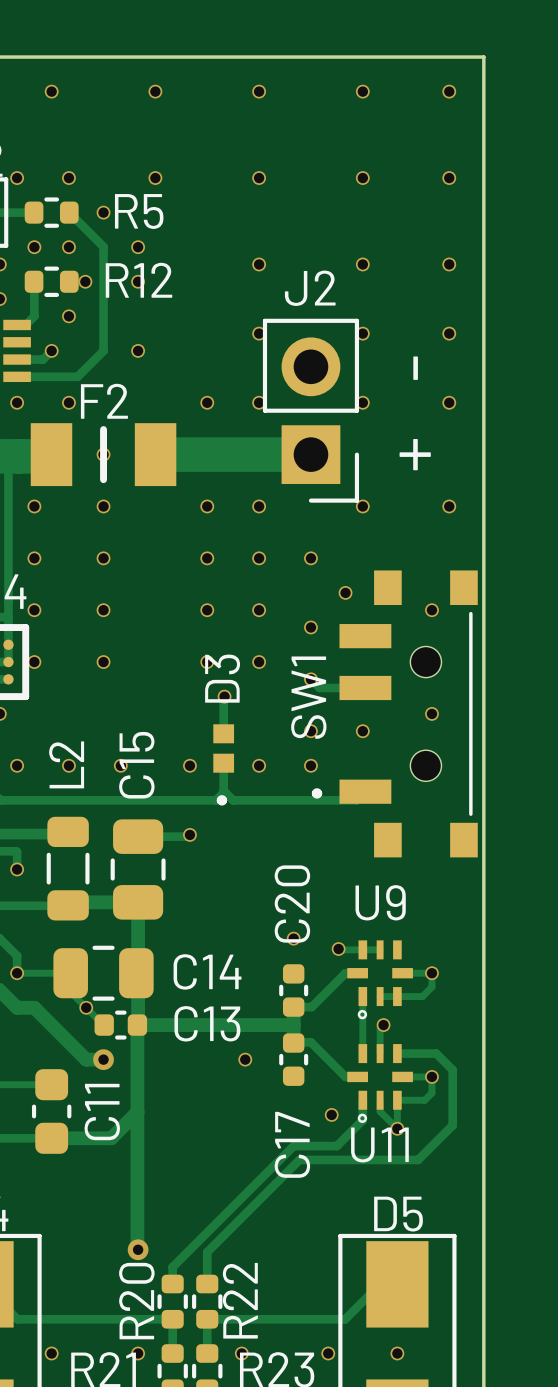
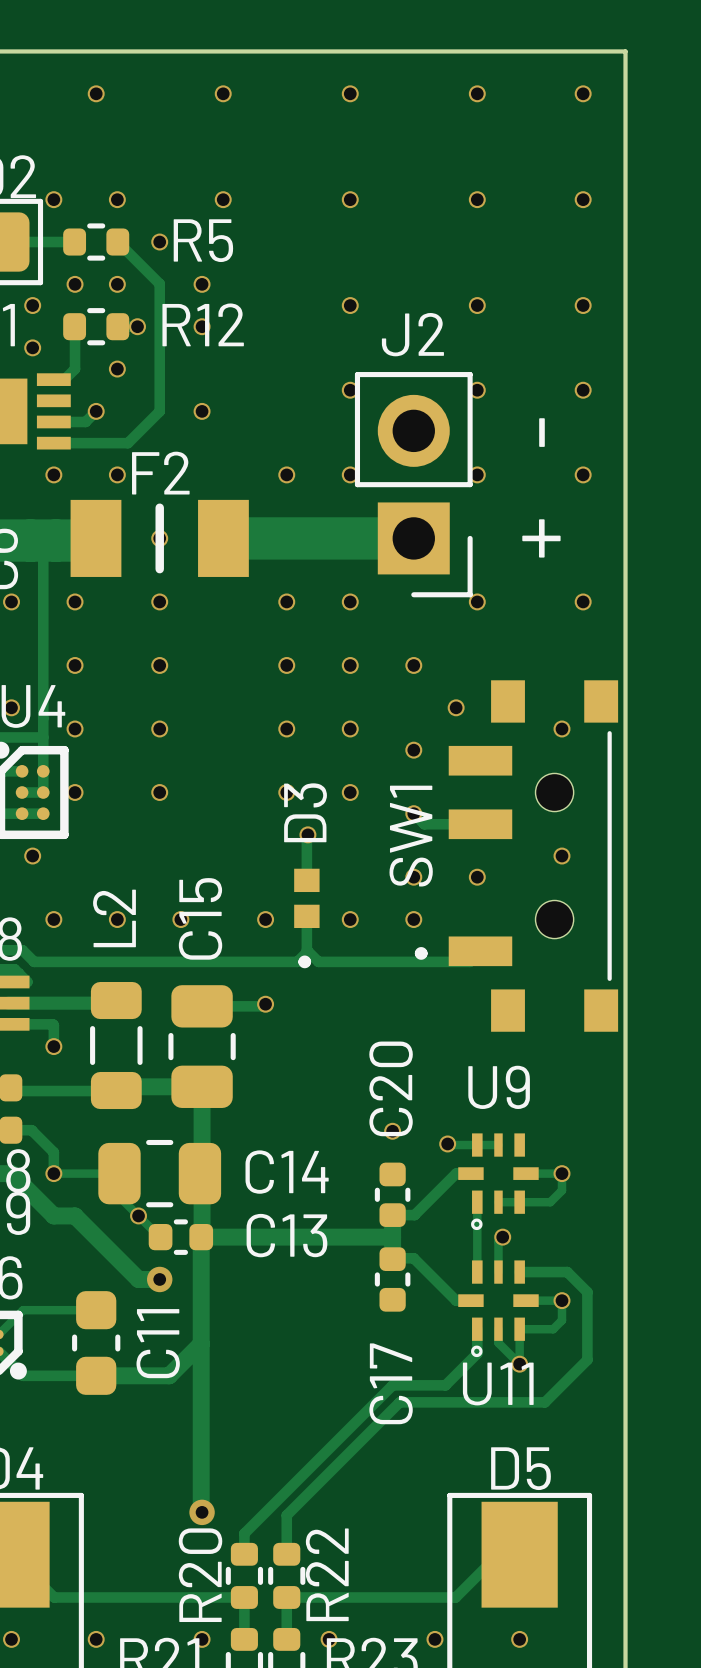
via: (245, 1059) -> none
via: (331, 1114) -> none

